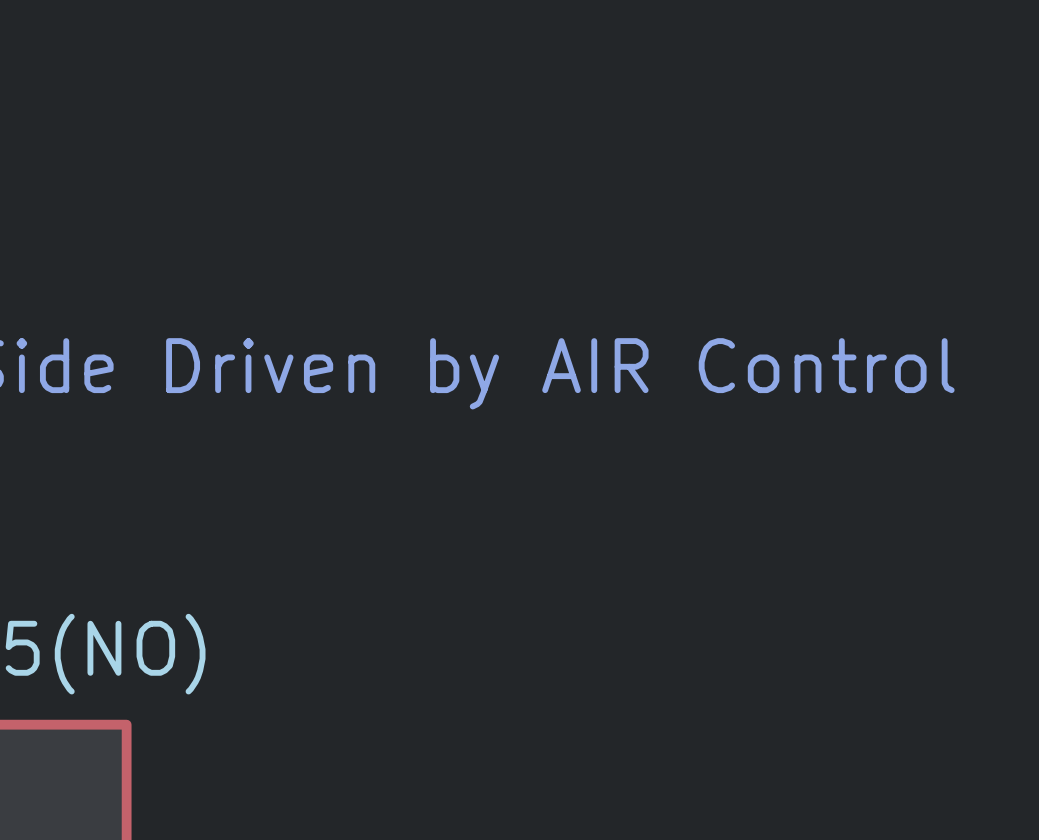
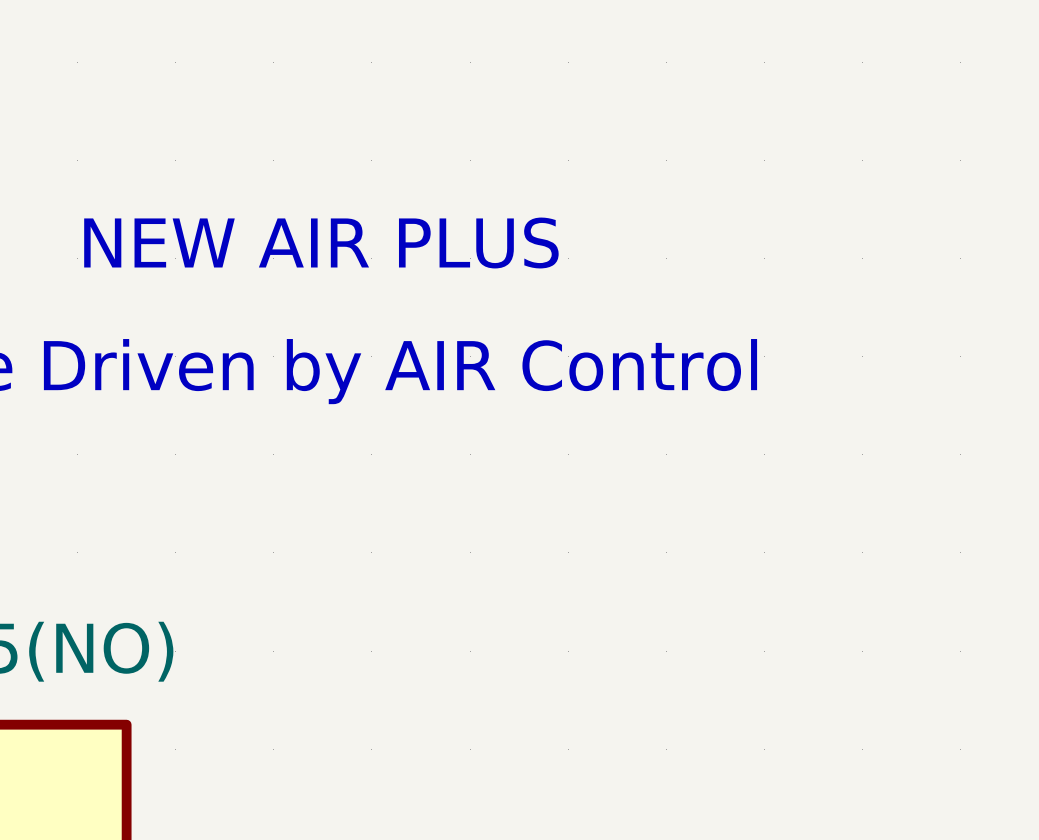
text: none -> NEW AIR PLUS (321, 243)

